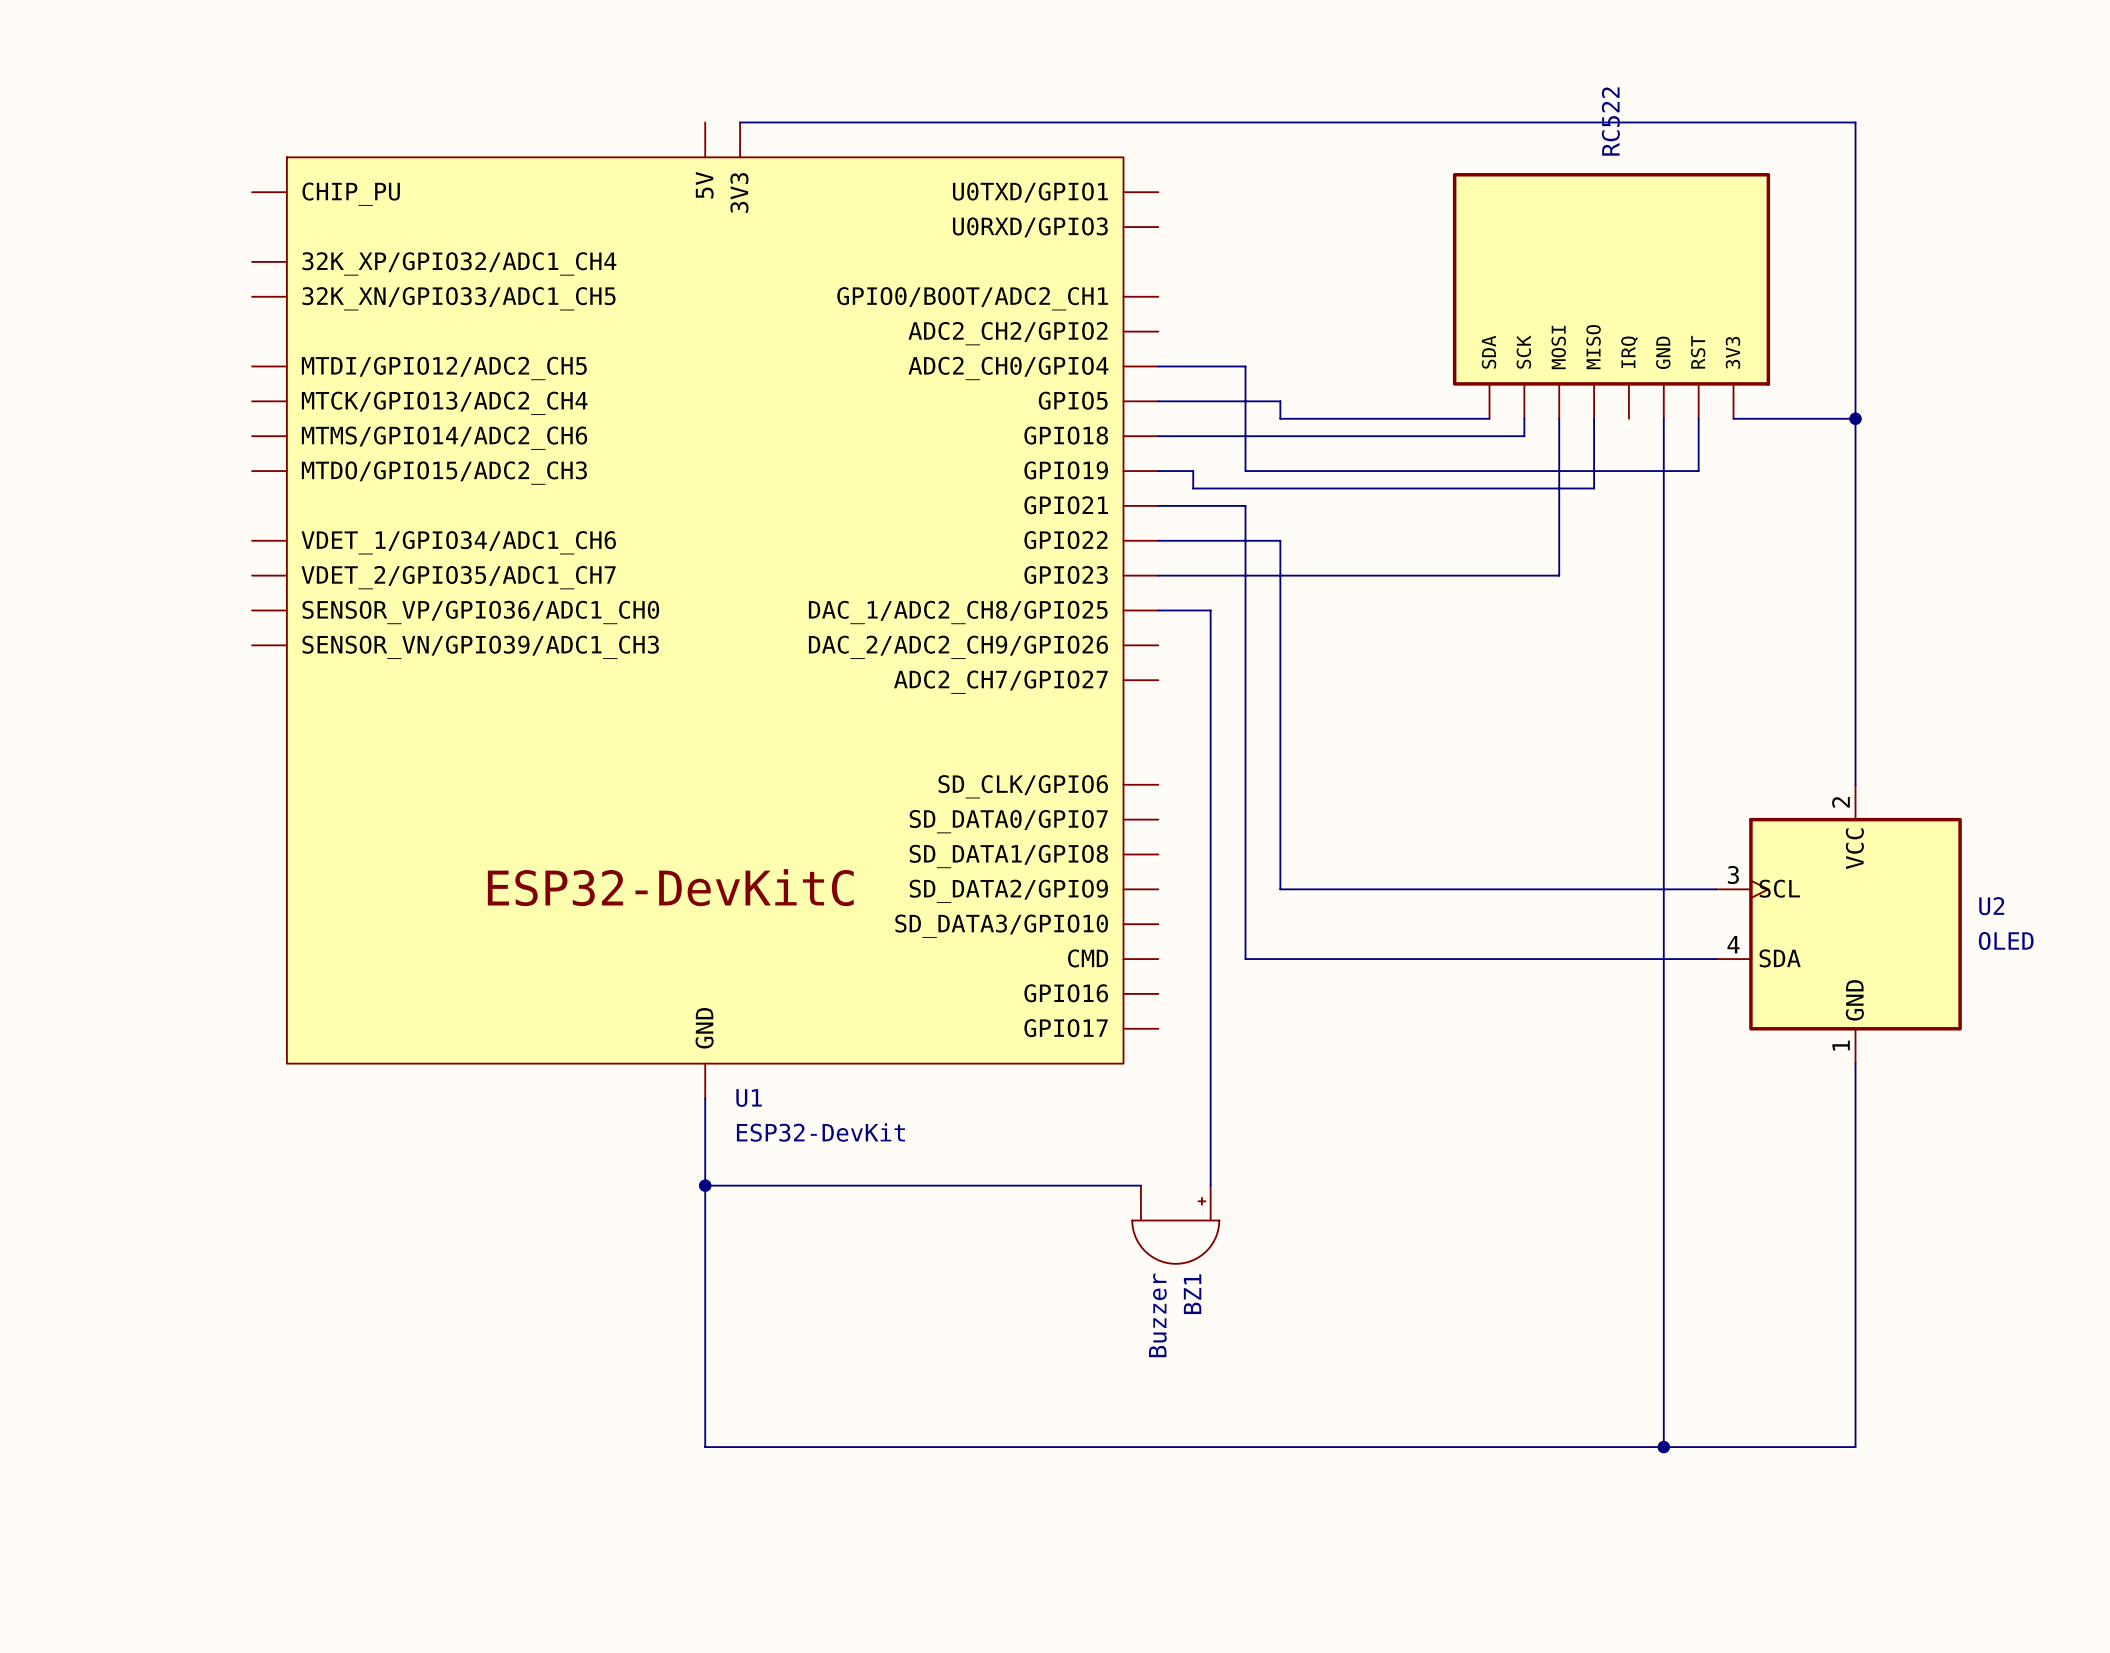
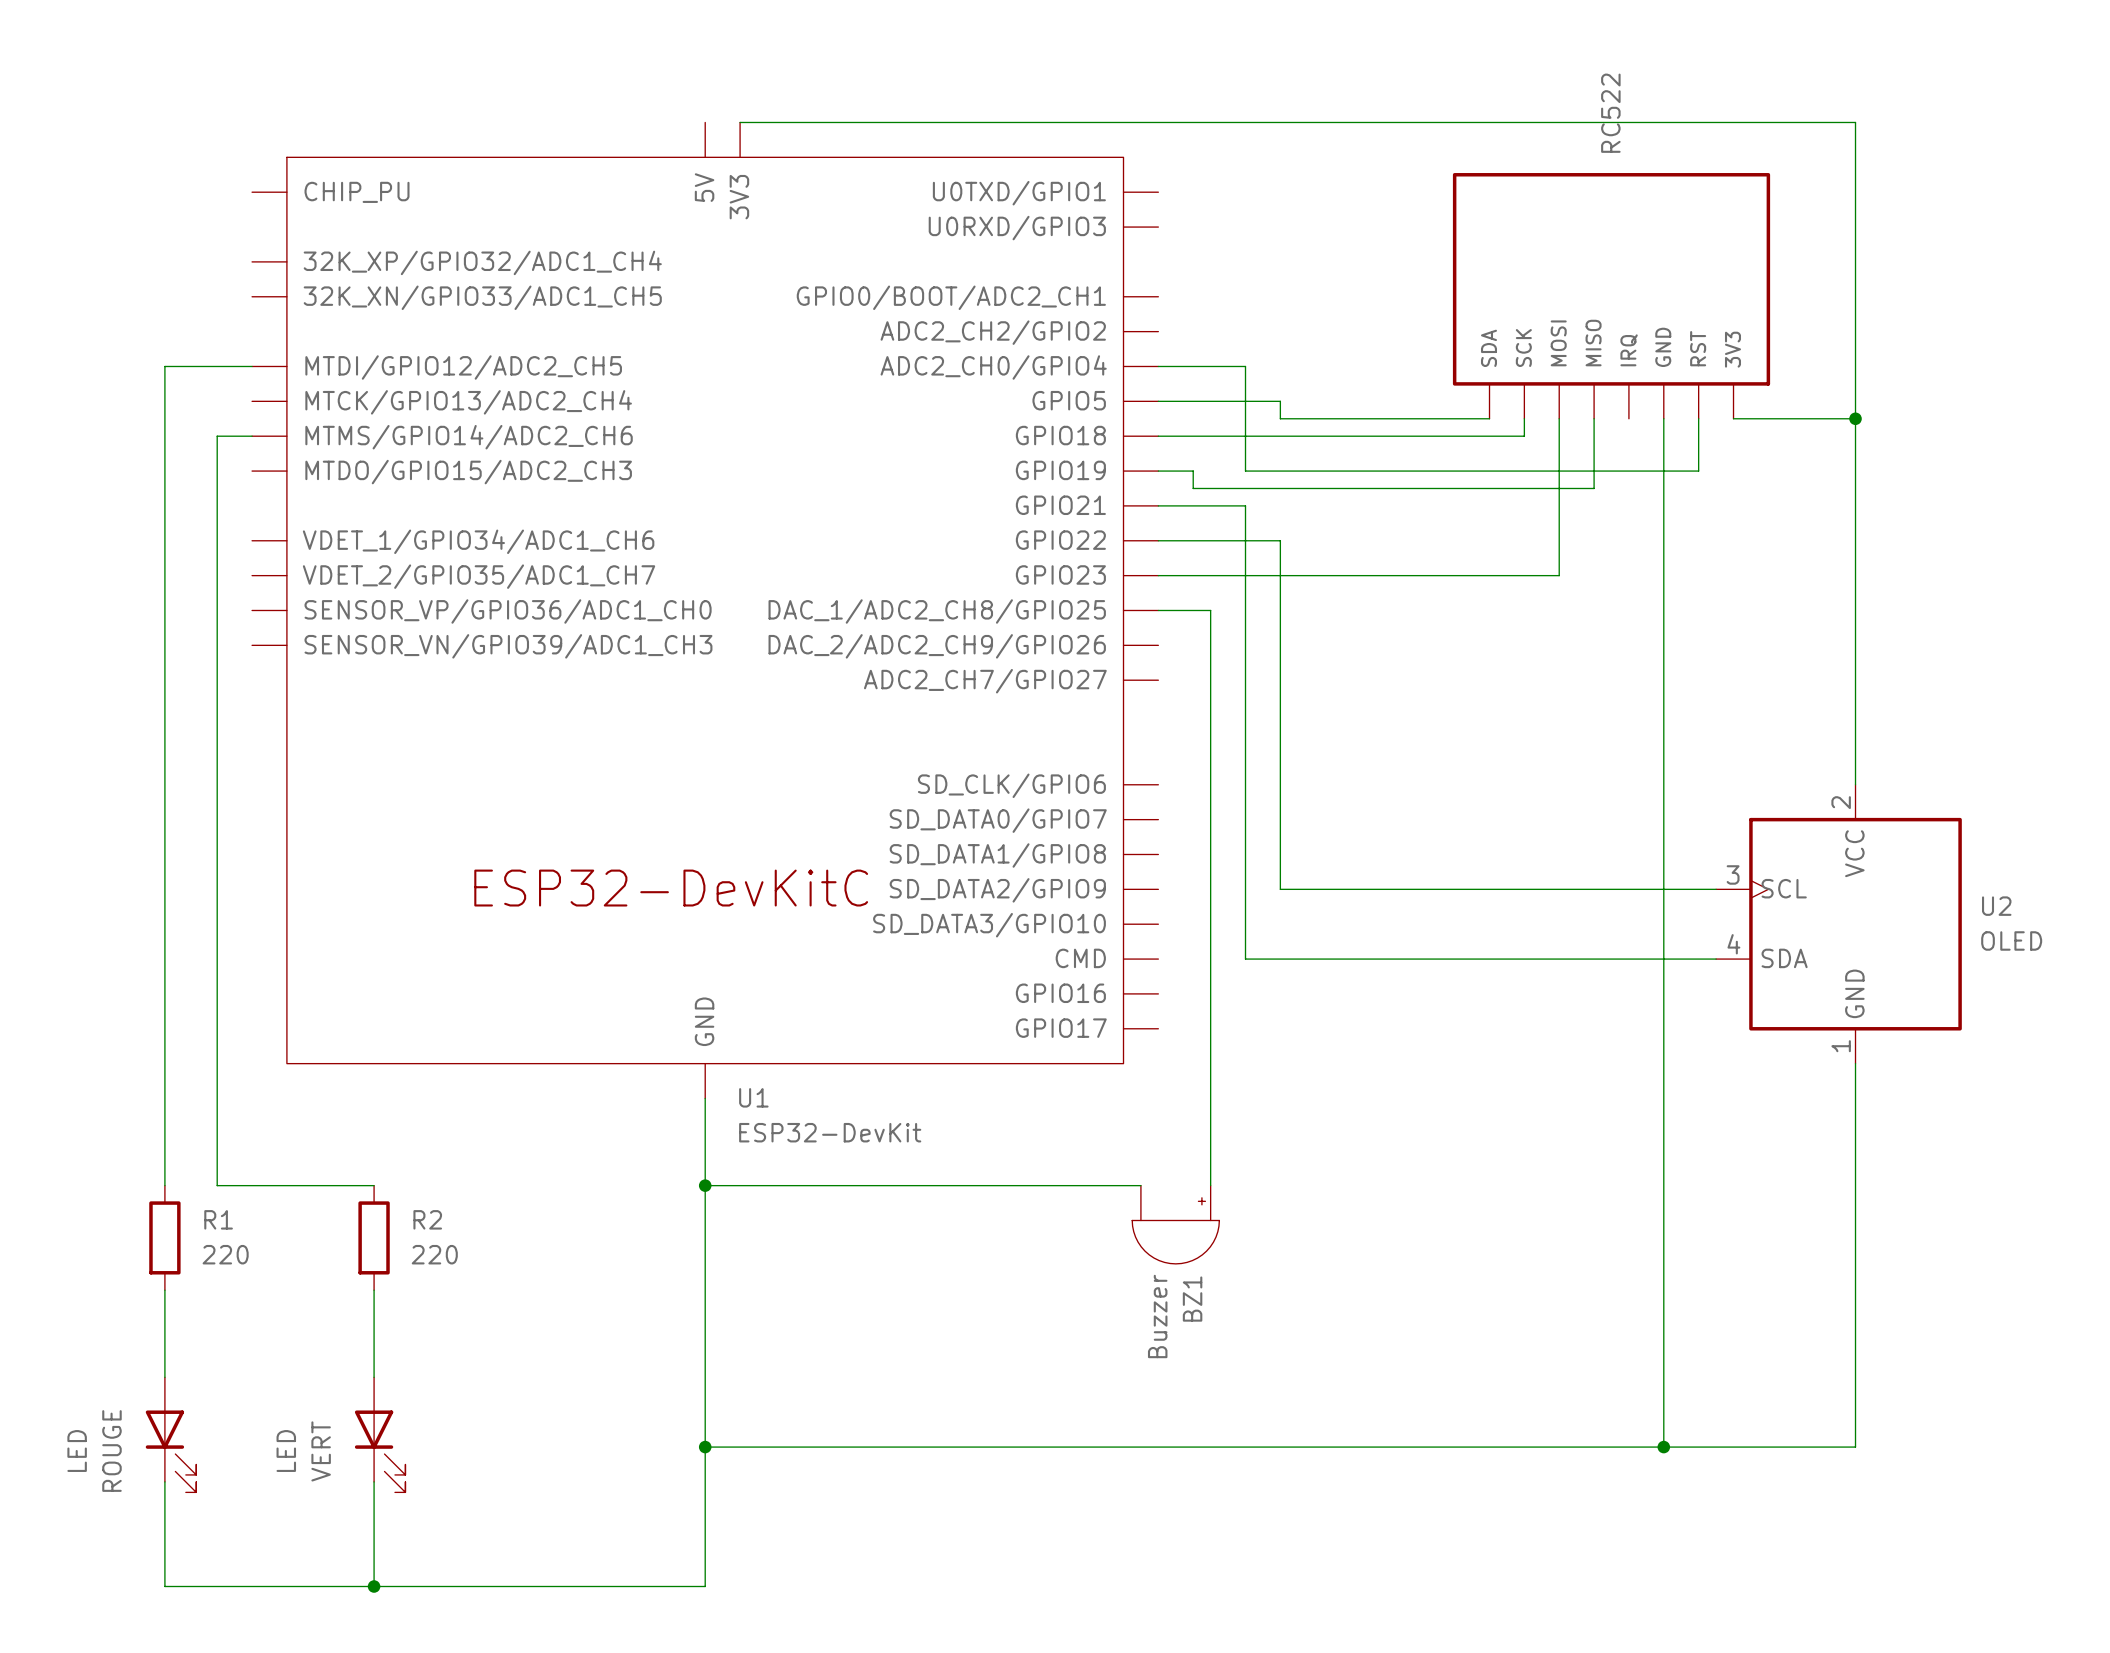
wire: none -> (252, 366) (164, 366) (164, 1185)
wire: none -> (252, 436) (217, 436) (217, 1185) (374, 1185)
R1: none -> 220 (164, 1237)
R2: none -> 220 (374, 1237)
wire: none -> (164, 1290) (164, 1377)
wire: none -> (374, 1290) (374, 1377)
LED: none -> ROUGE (171, 1434)
LED: none -> VERT (380, 1434)
wire: none -> (705, 1447) (705, 1586) (164, 1586) (164, 1481)
junction: none -> (705, 1447)
wire: none -> (374, 1481) (374, 1586)
junction: none -> (374, 1586)

